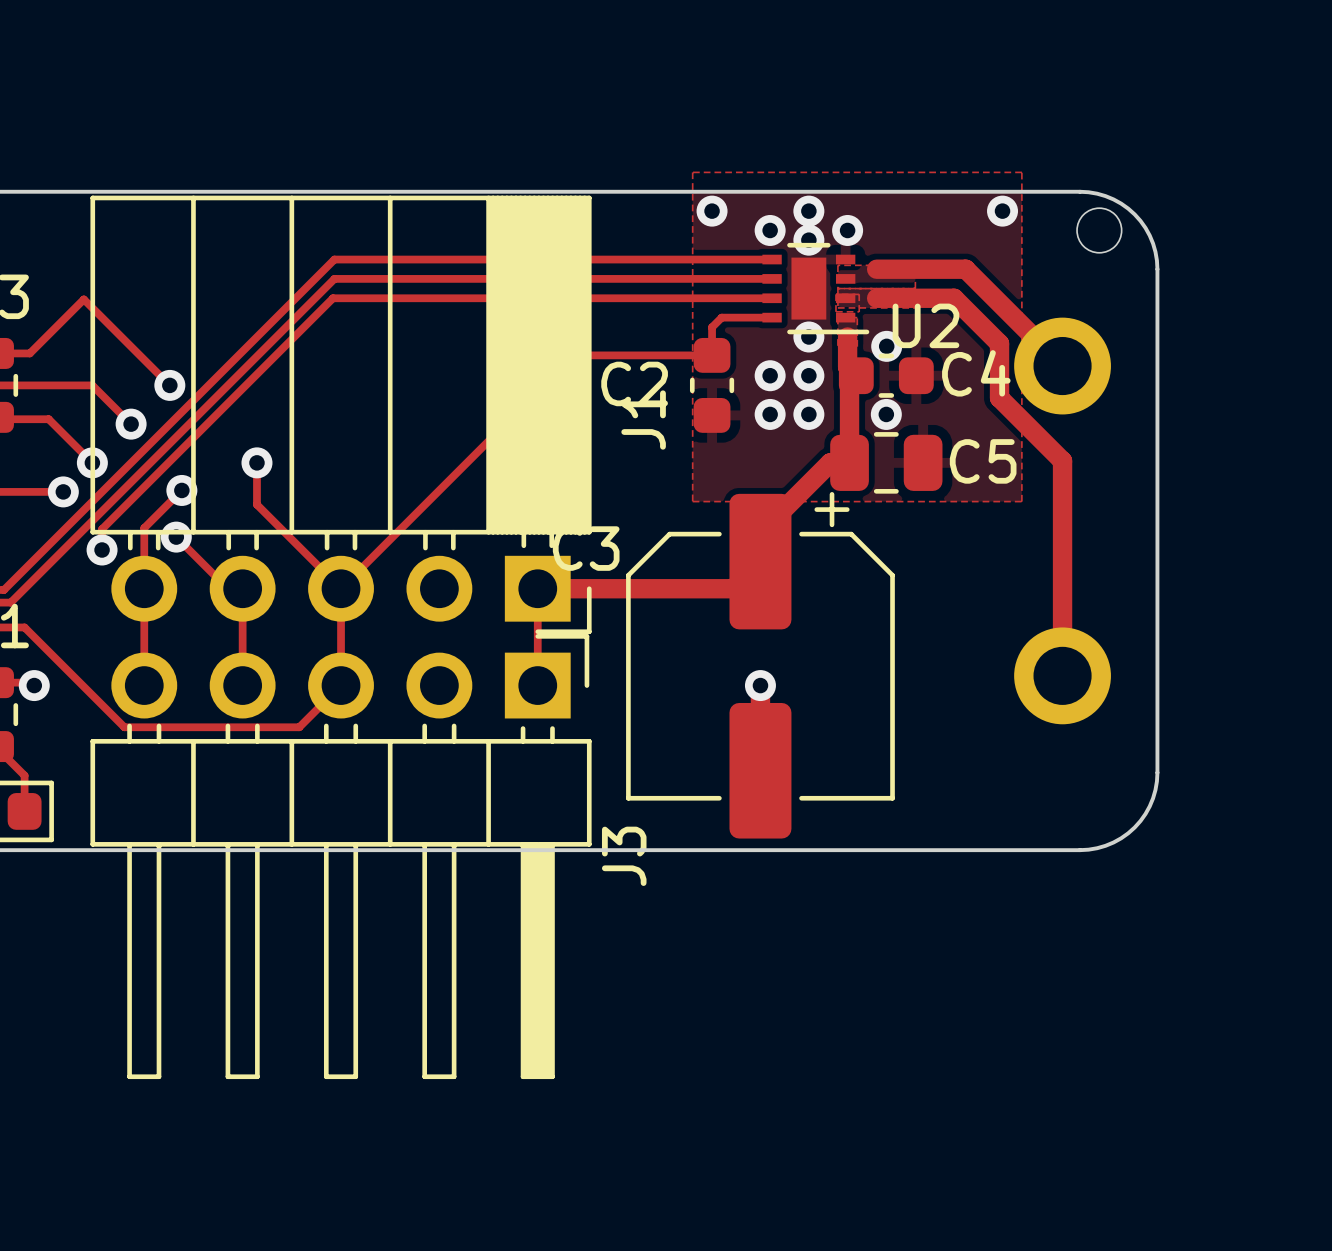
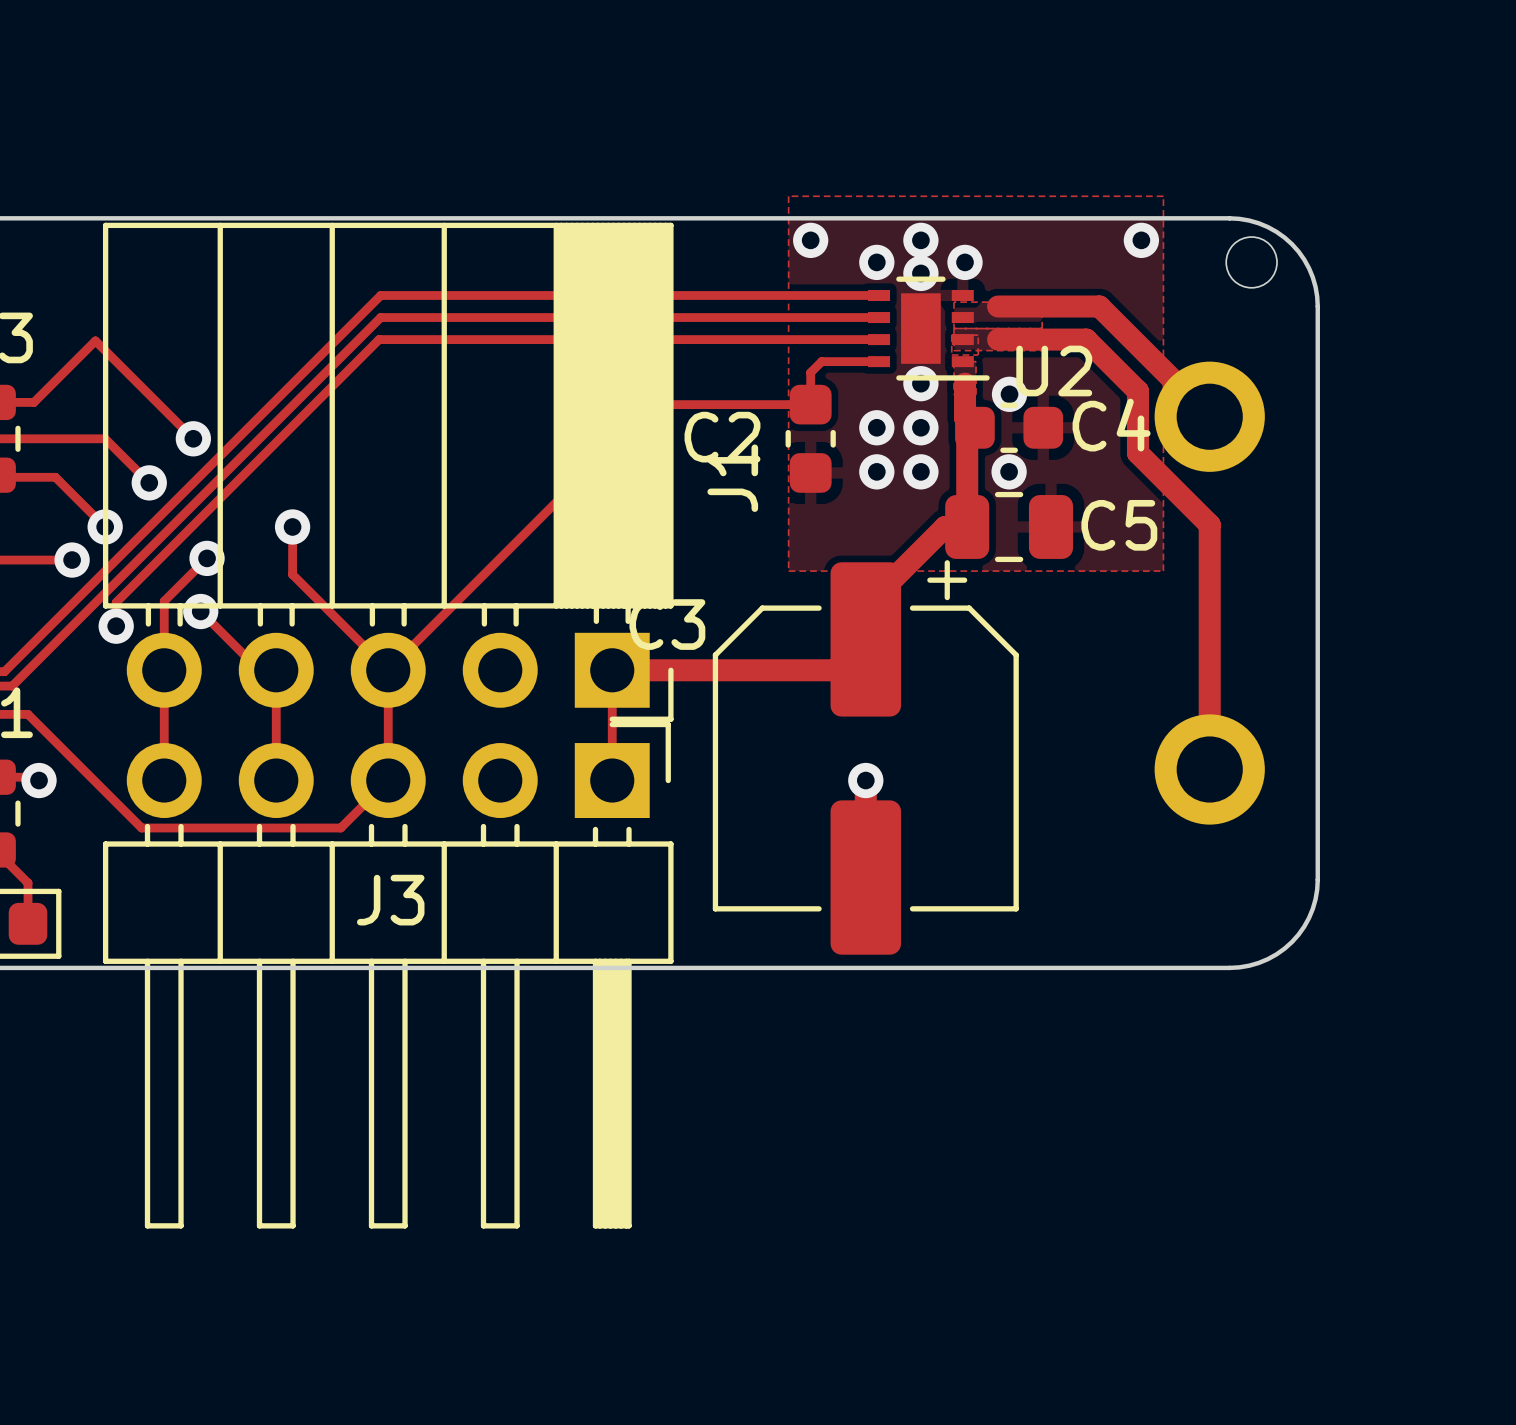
J3 name rotation: 0° (624, 856) -> 90° clockwise (390, 900)
J3 name position: J3 (624, 856) -> J3 (390, 900)

